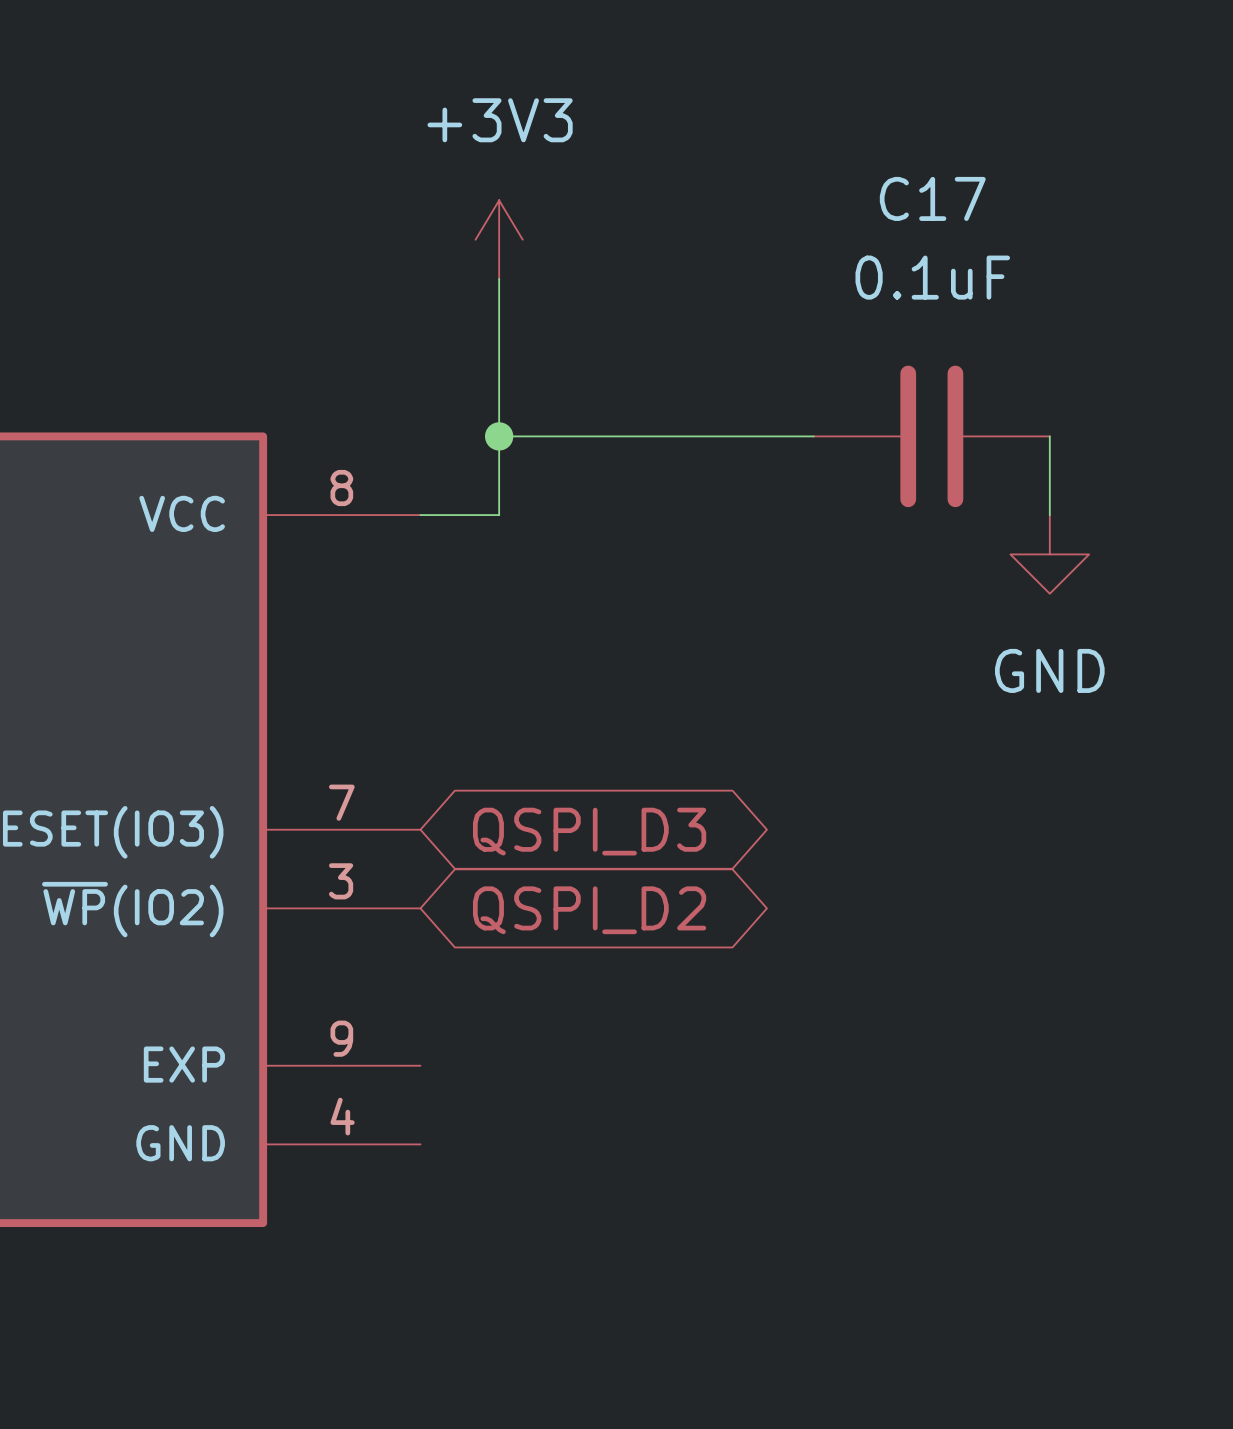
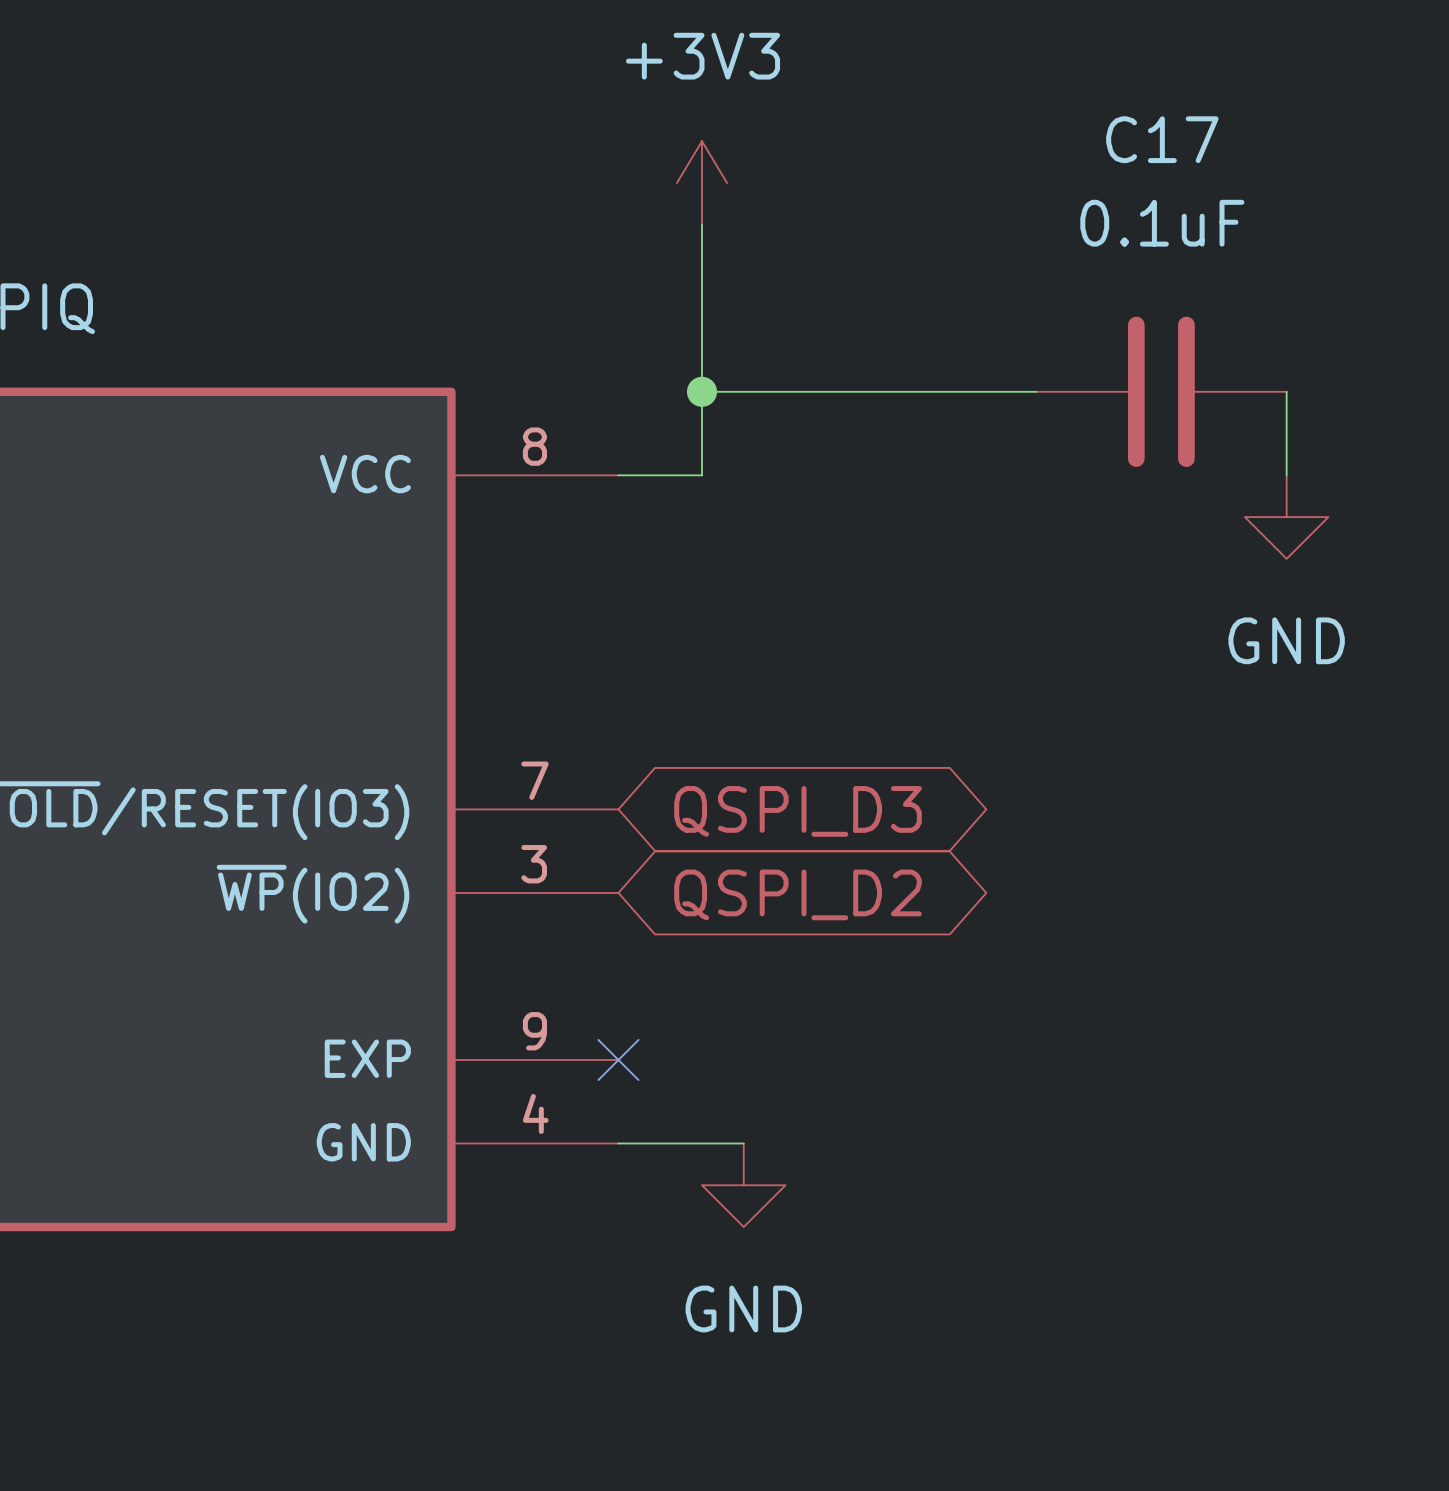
no-connect mark: none -> (618, 1059)
wire: none -> (618, 1143) (743, 1143)
power symbol: none -> GND (743, 1185)

